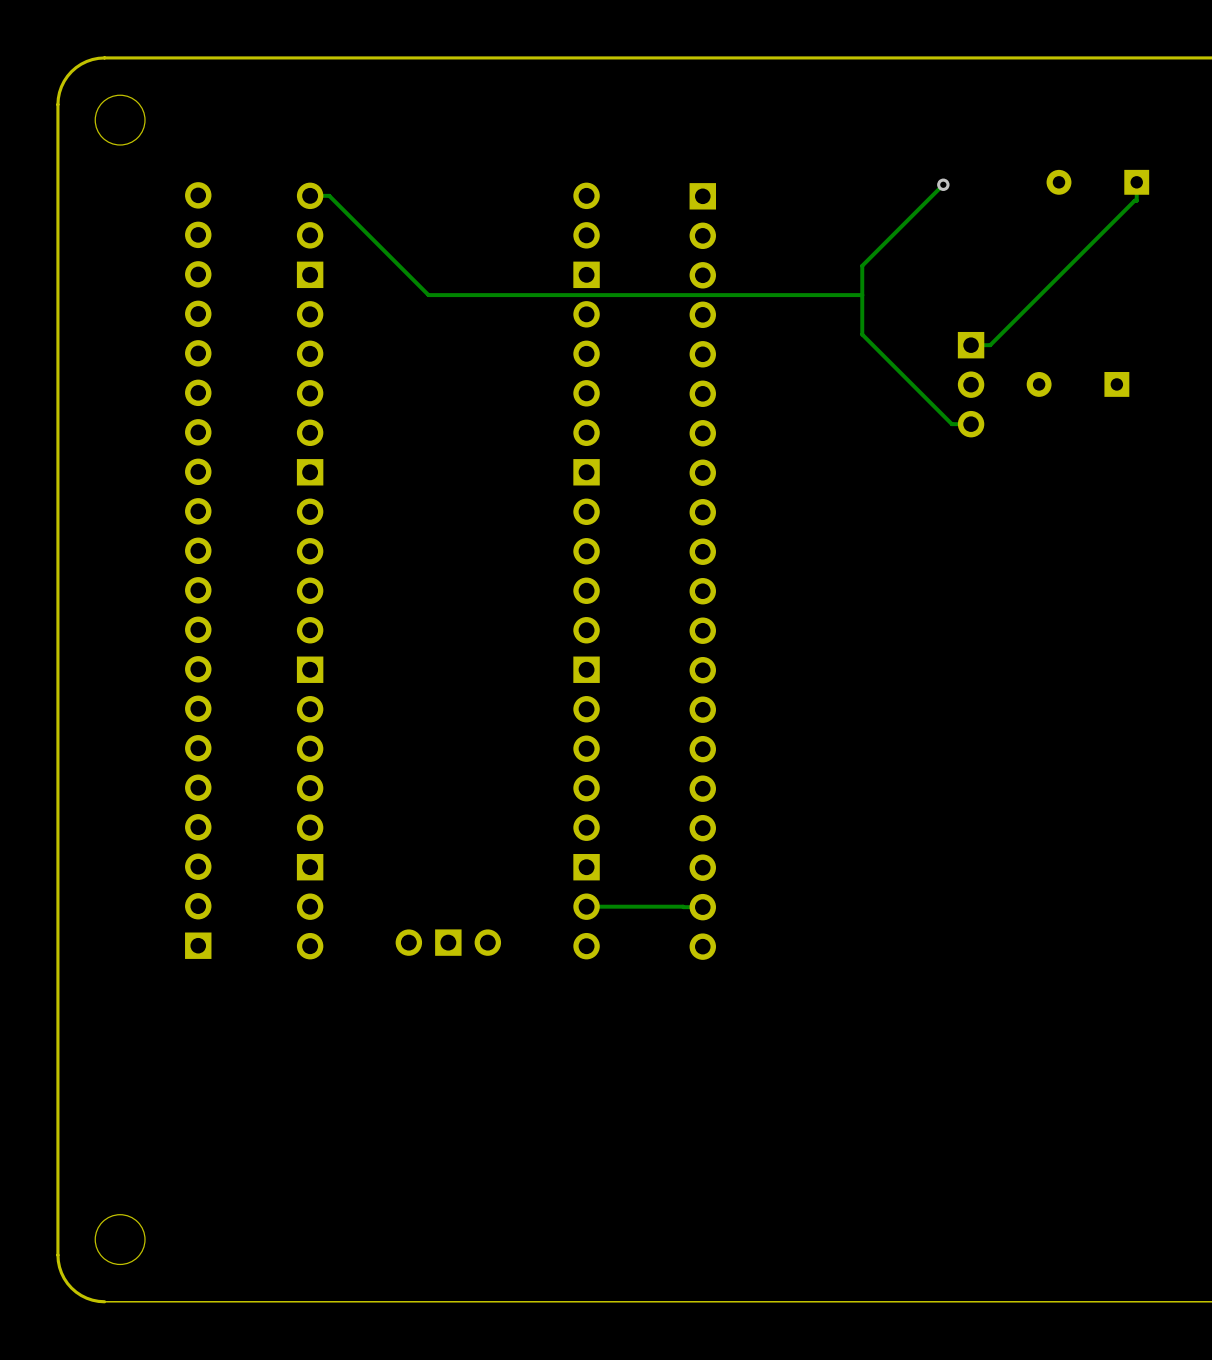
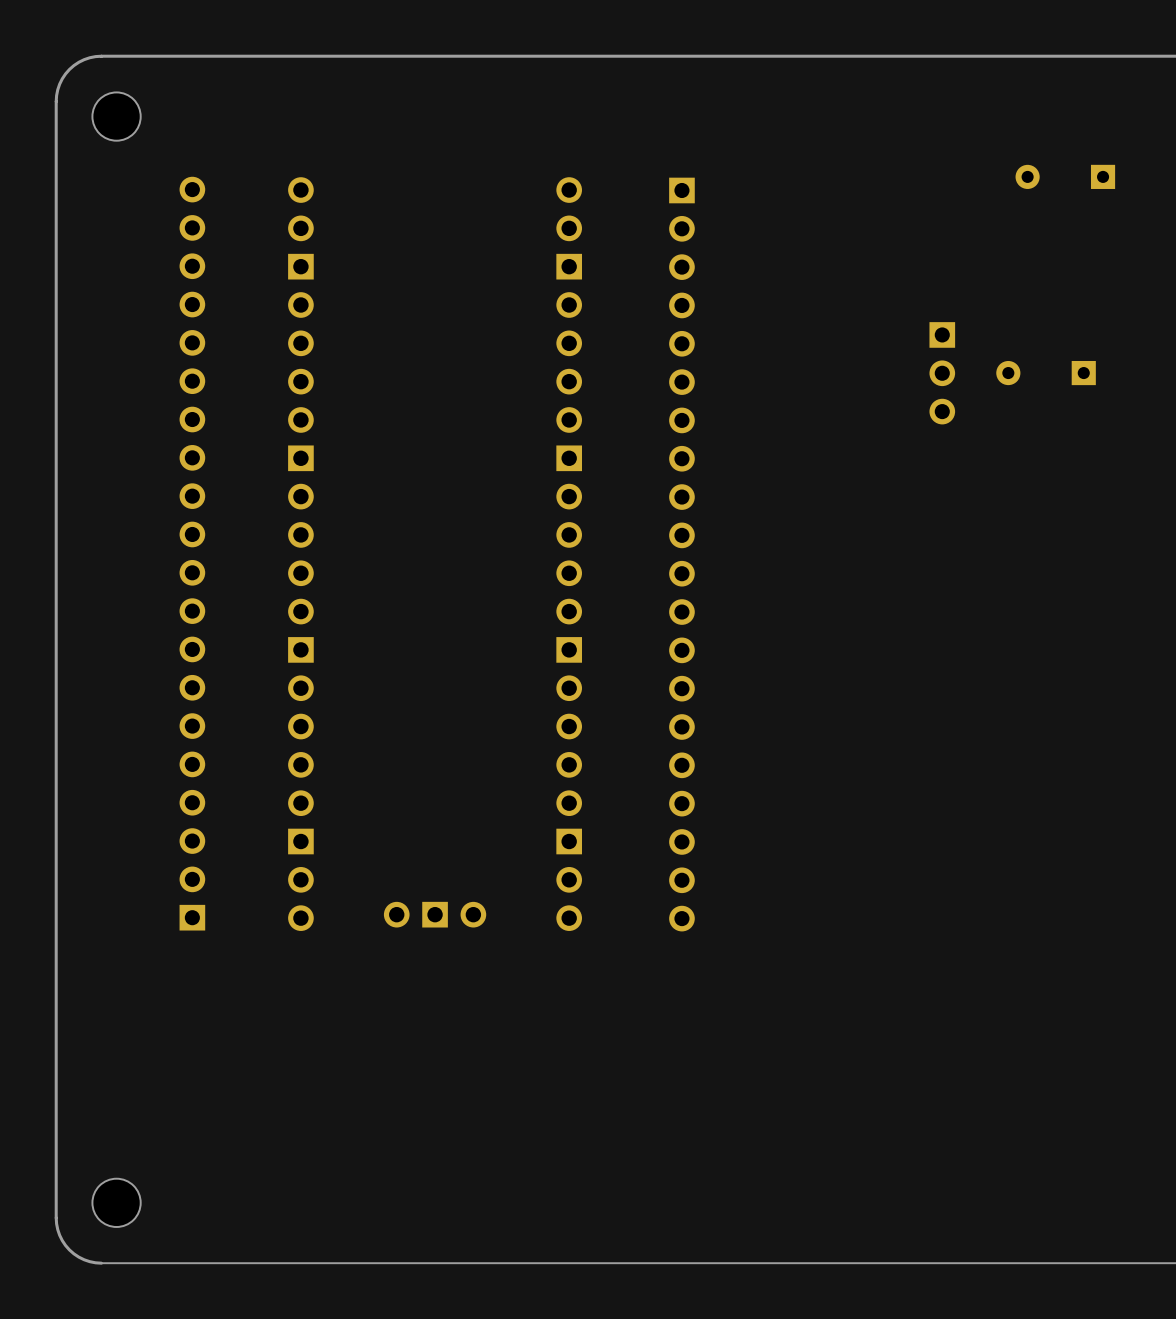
track: (1136, 182) (1136, 200) (990, 345) (971, 345) -> none
track: (943, 184) (862, 265) (862, 334) (951, 424) (971, 424) -> none
via: (943, 184) -> none
track: (310, 195) (329, 195) (428, 295) (862, 295) -> none
track: (586, 906) (702, 907) -> none

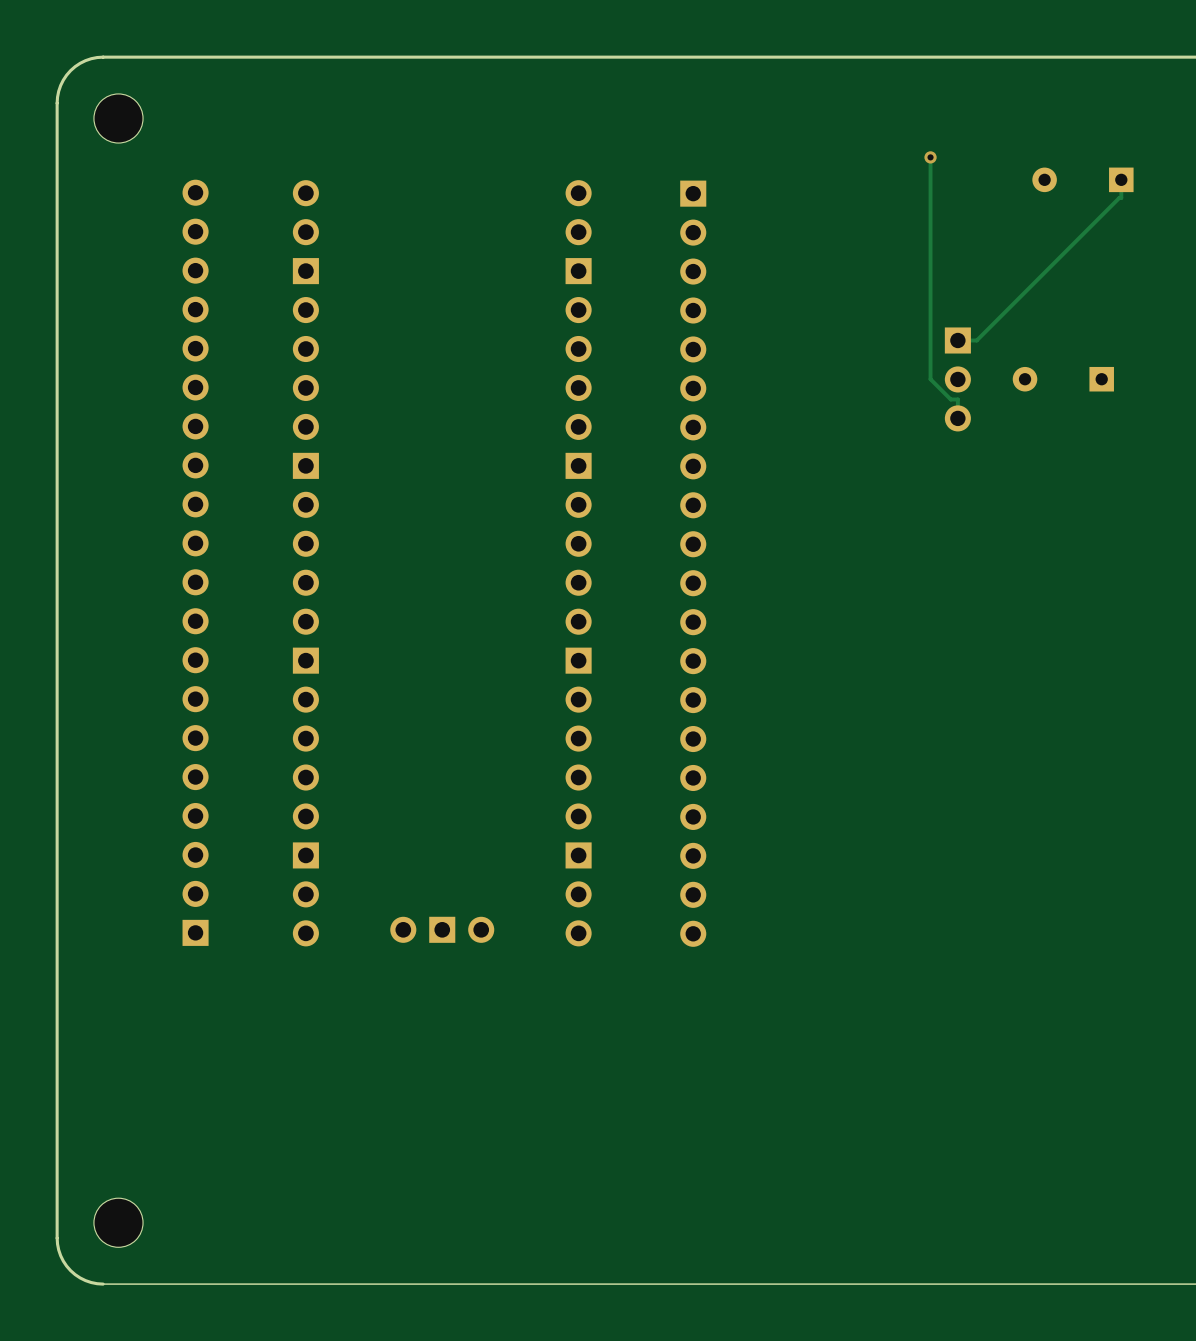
track: none -> (930, 157) (930, 379) (950, 399) (957, 399) (957, 418)
via: none -> (930, 157)
track: none -> (1121, 179) (1121, 197) (976, 340) (957, 340)

